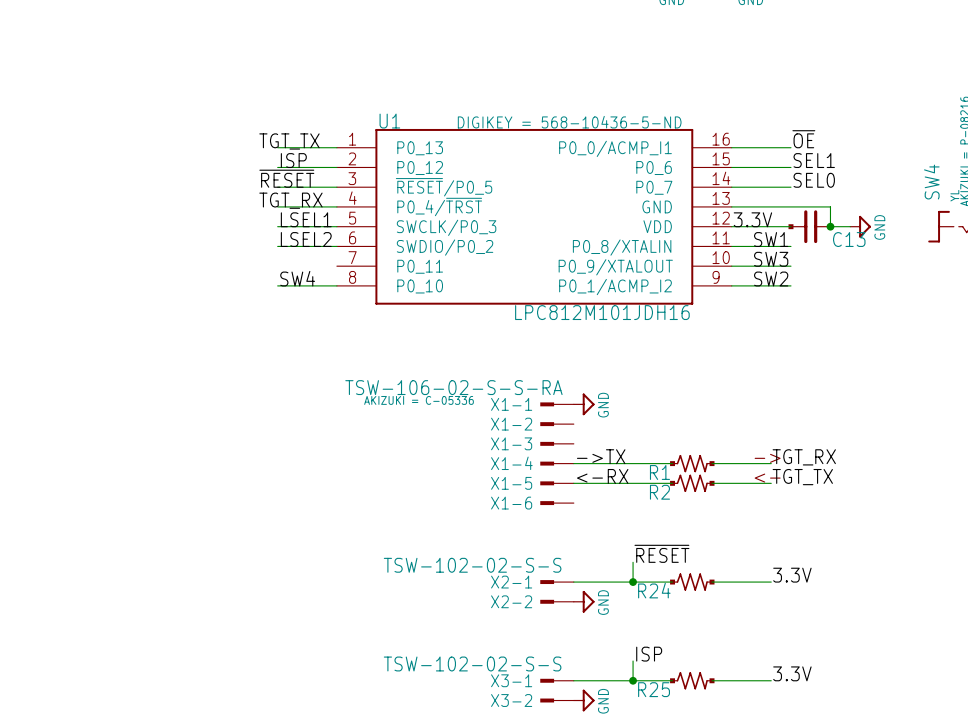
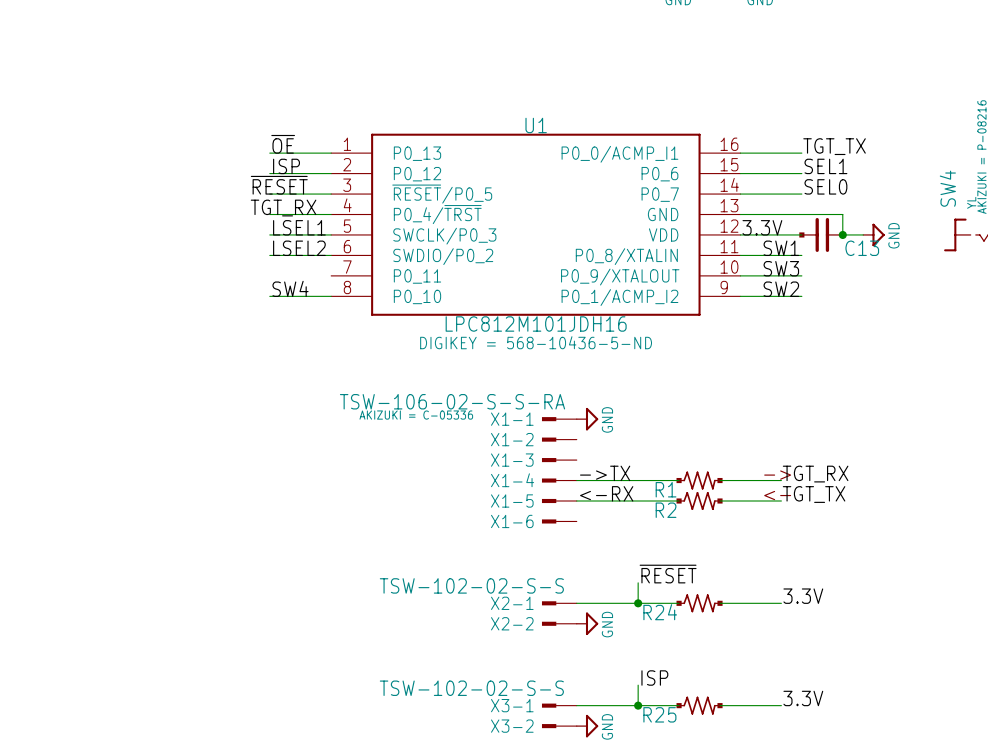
U1 name position: U1 (389, 121) -> U1 (536, 125)
U1 text position: DIGIKEY = 568-10436-5-ND (569, 122) -> DIGIKEY = 568-10436-5-ND (536, 342)
label: none -> ~{OE} (283, 144)
label: ~{OE} (803, 139) -> TGT_TX (834, 146)
label: TGT_TX (289, 141) -> none
U1 value position: LPC812M101JDH16 (602, 312) -> LPC812M101JDH16 (536, 323)

